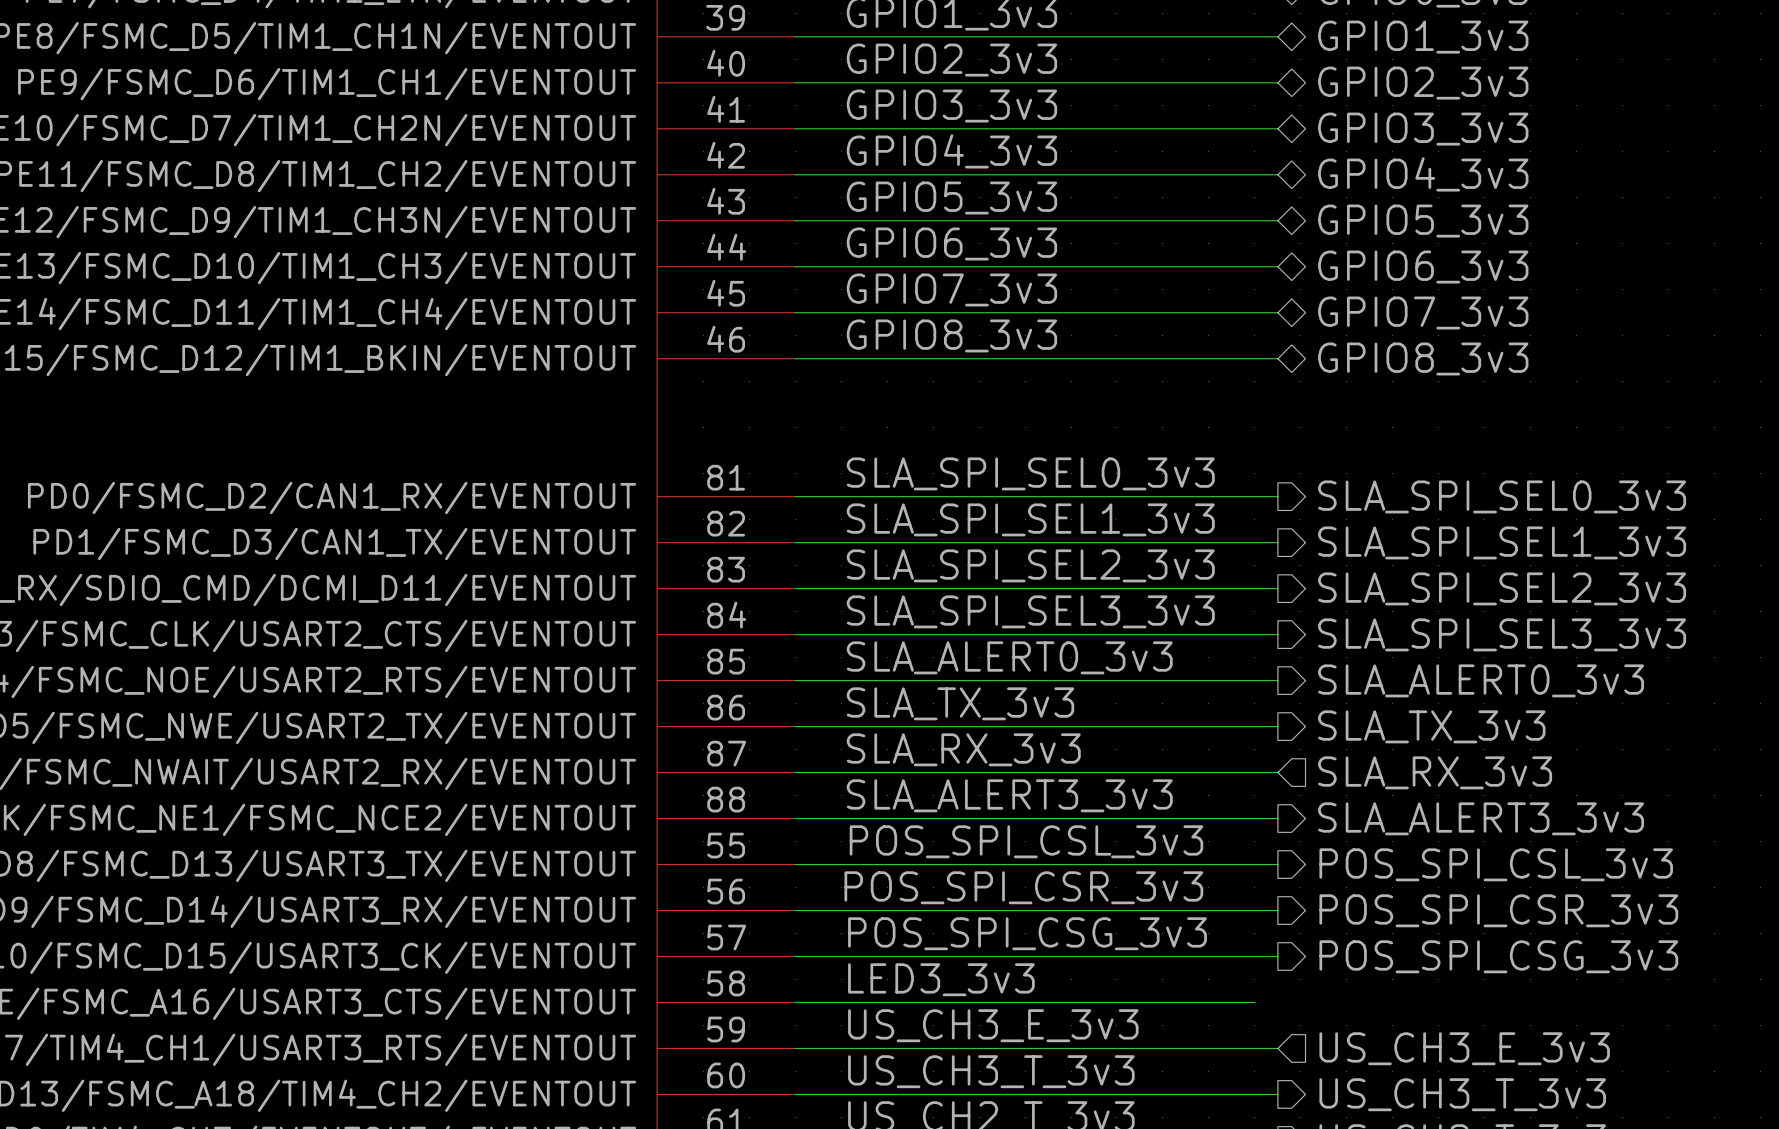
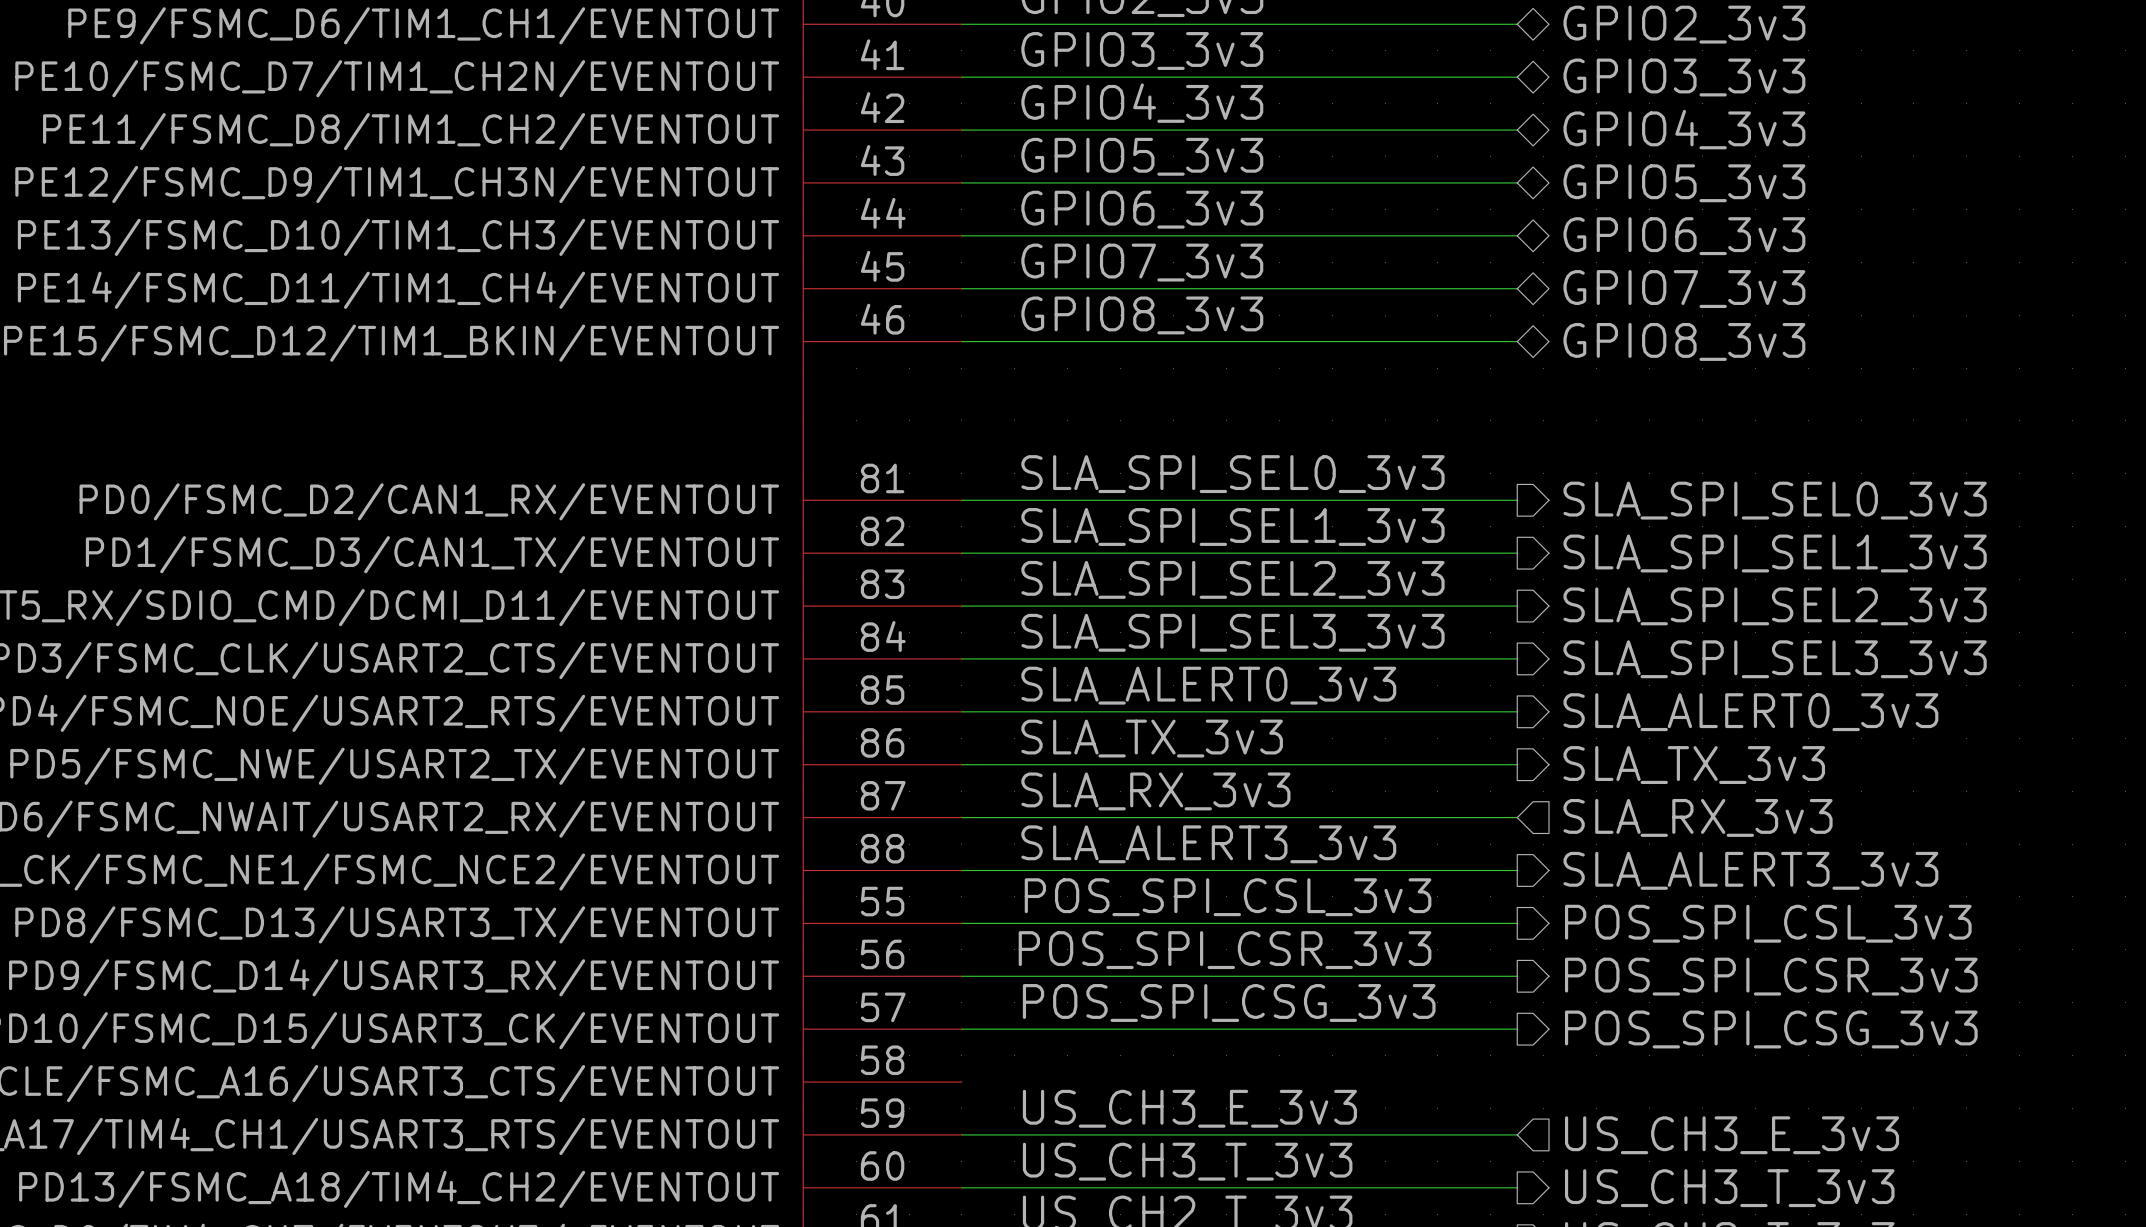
label: LED3_3v3 (941, 979) -> none
wire: (795, 1002) (1254, 1002) -> none

